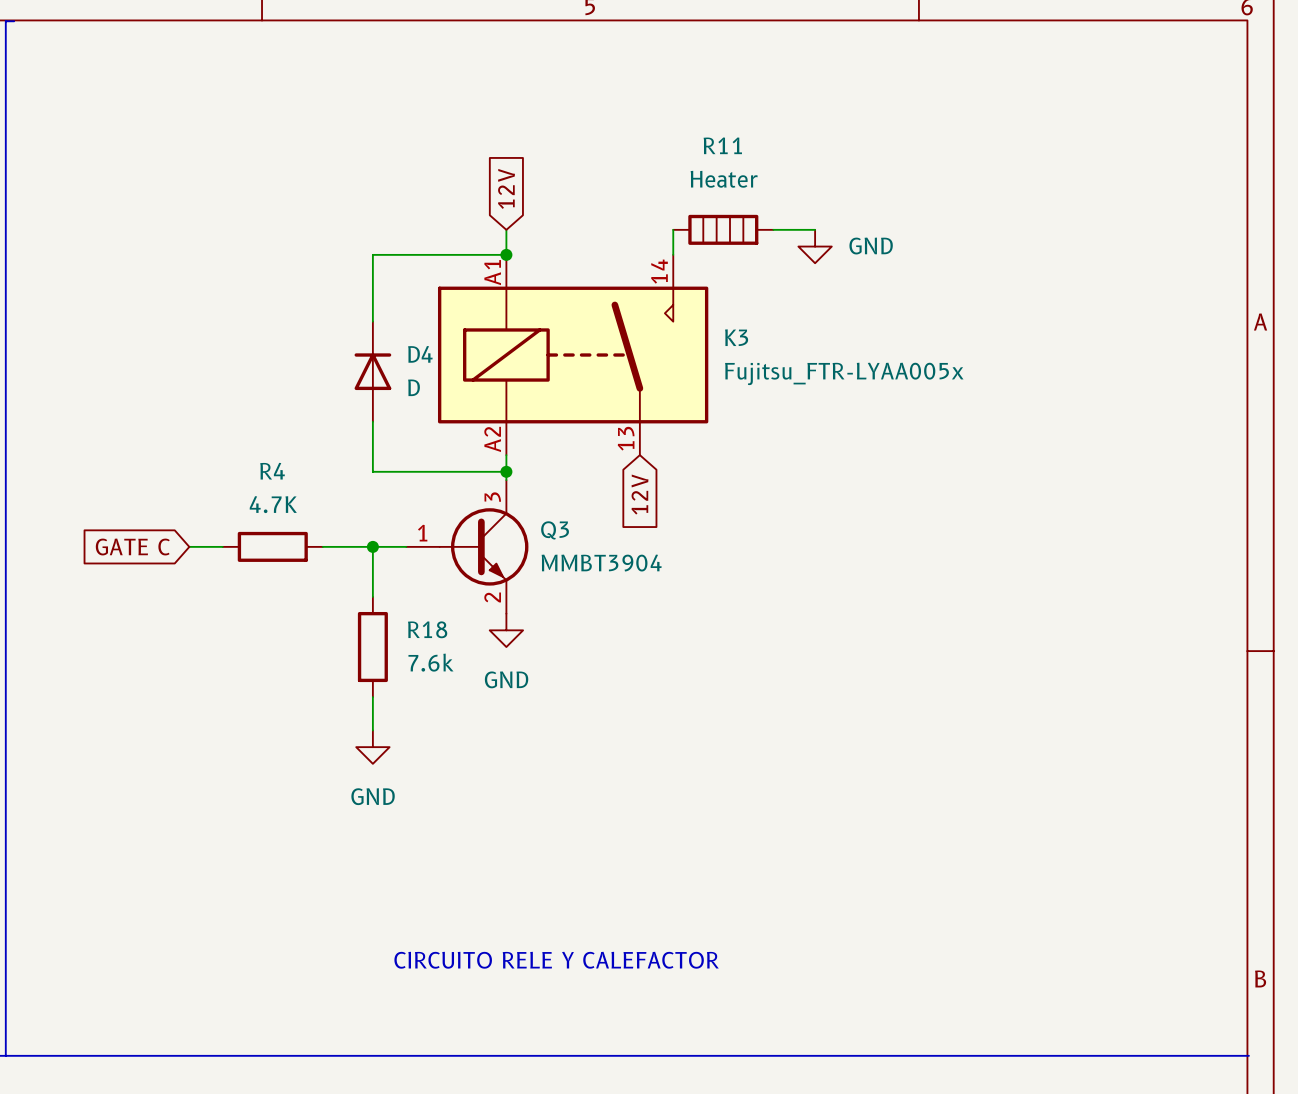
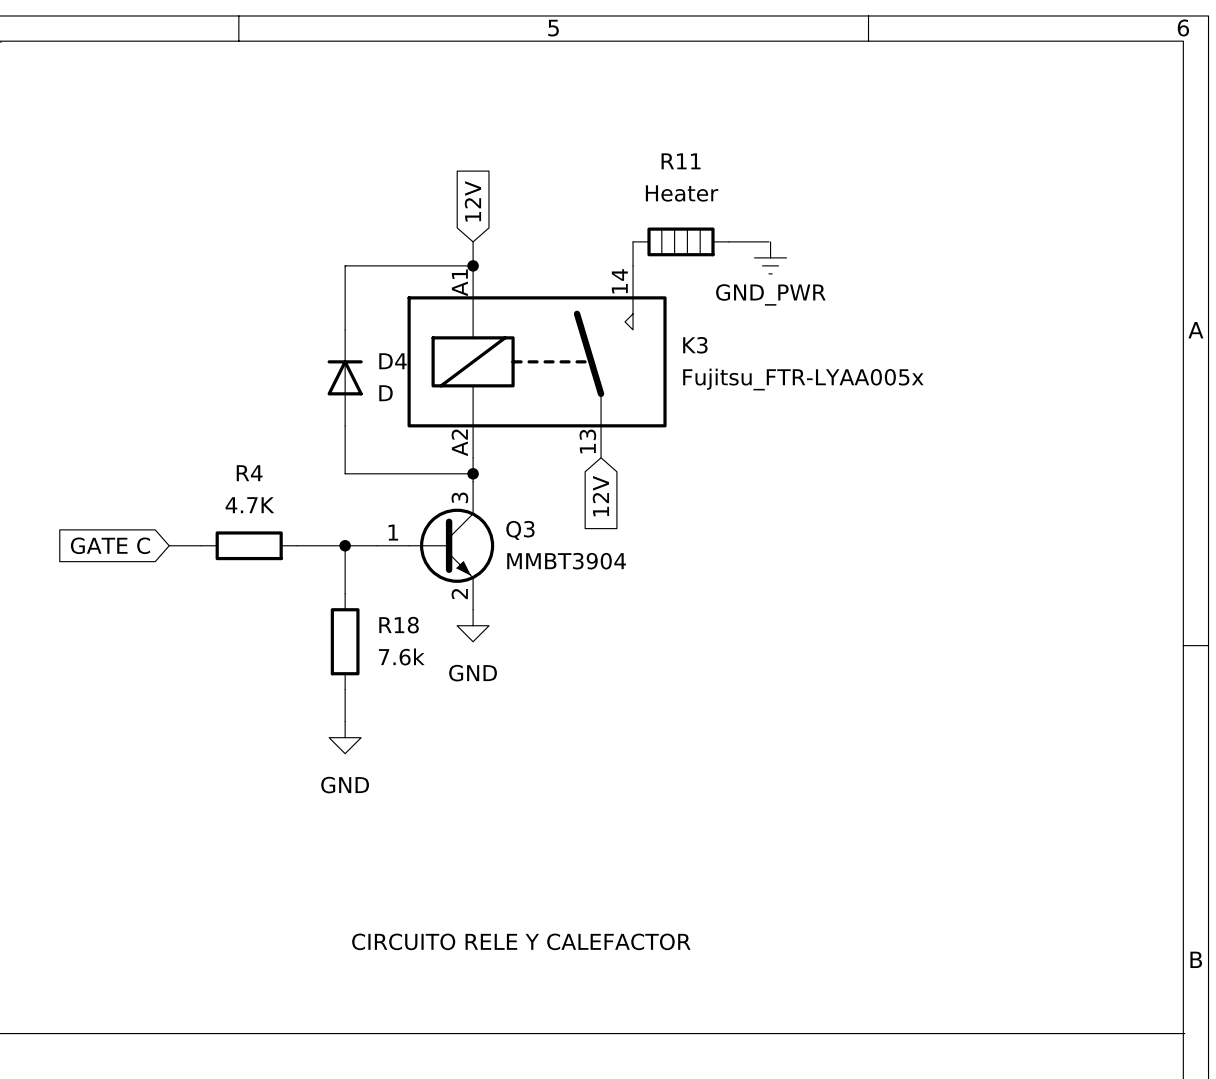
power symbol: GND (815, 246) -> GND_PWR (770, 257)

